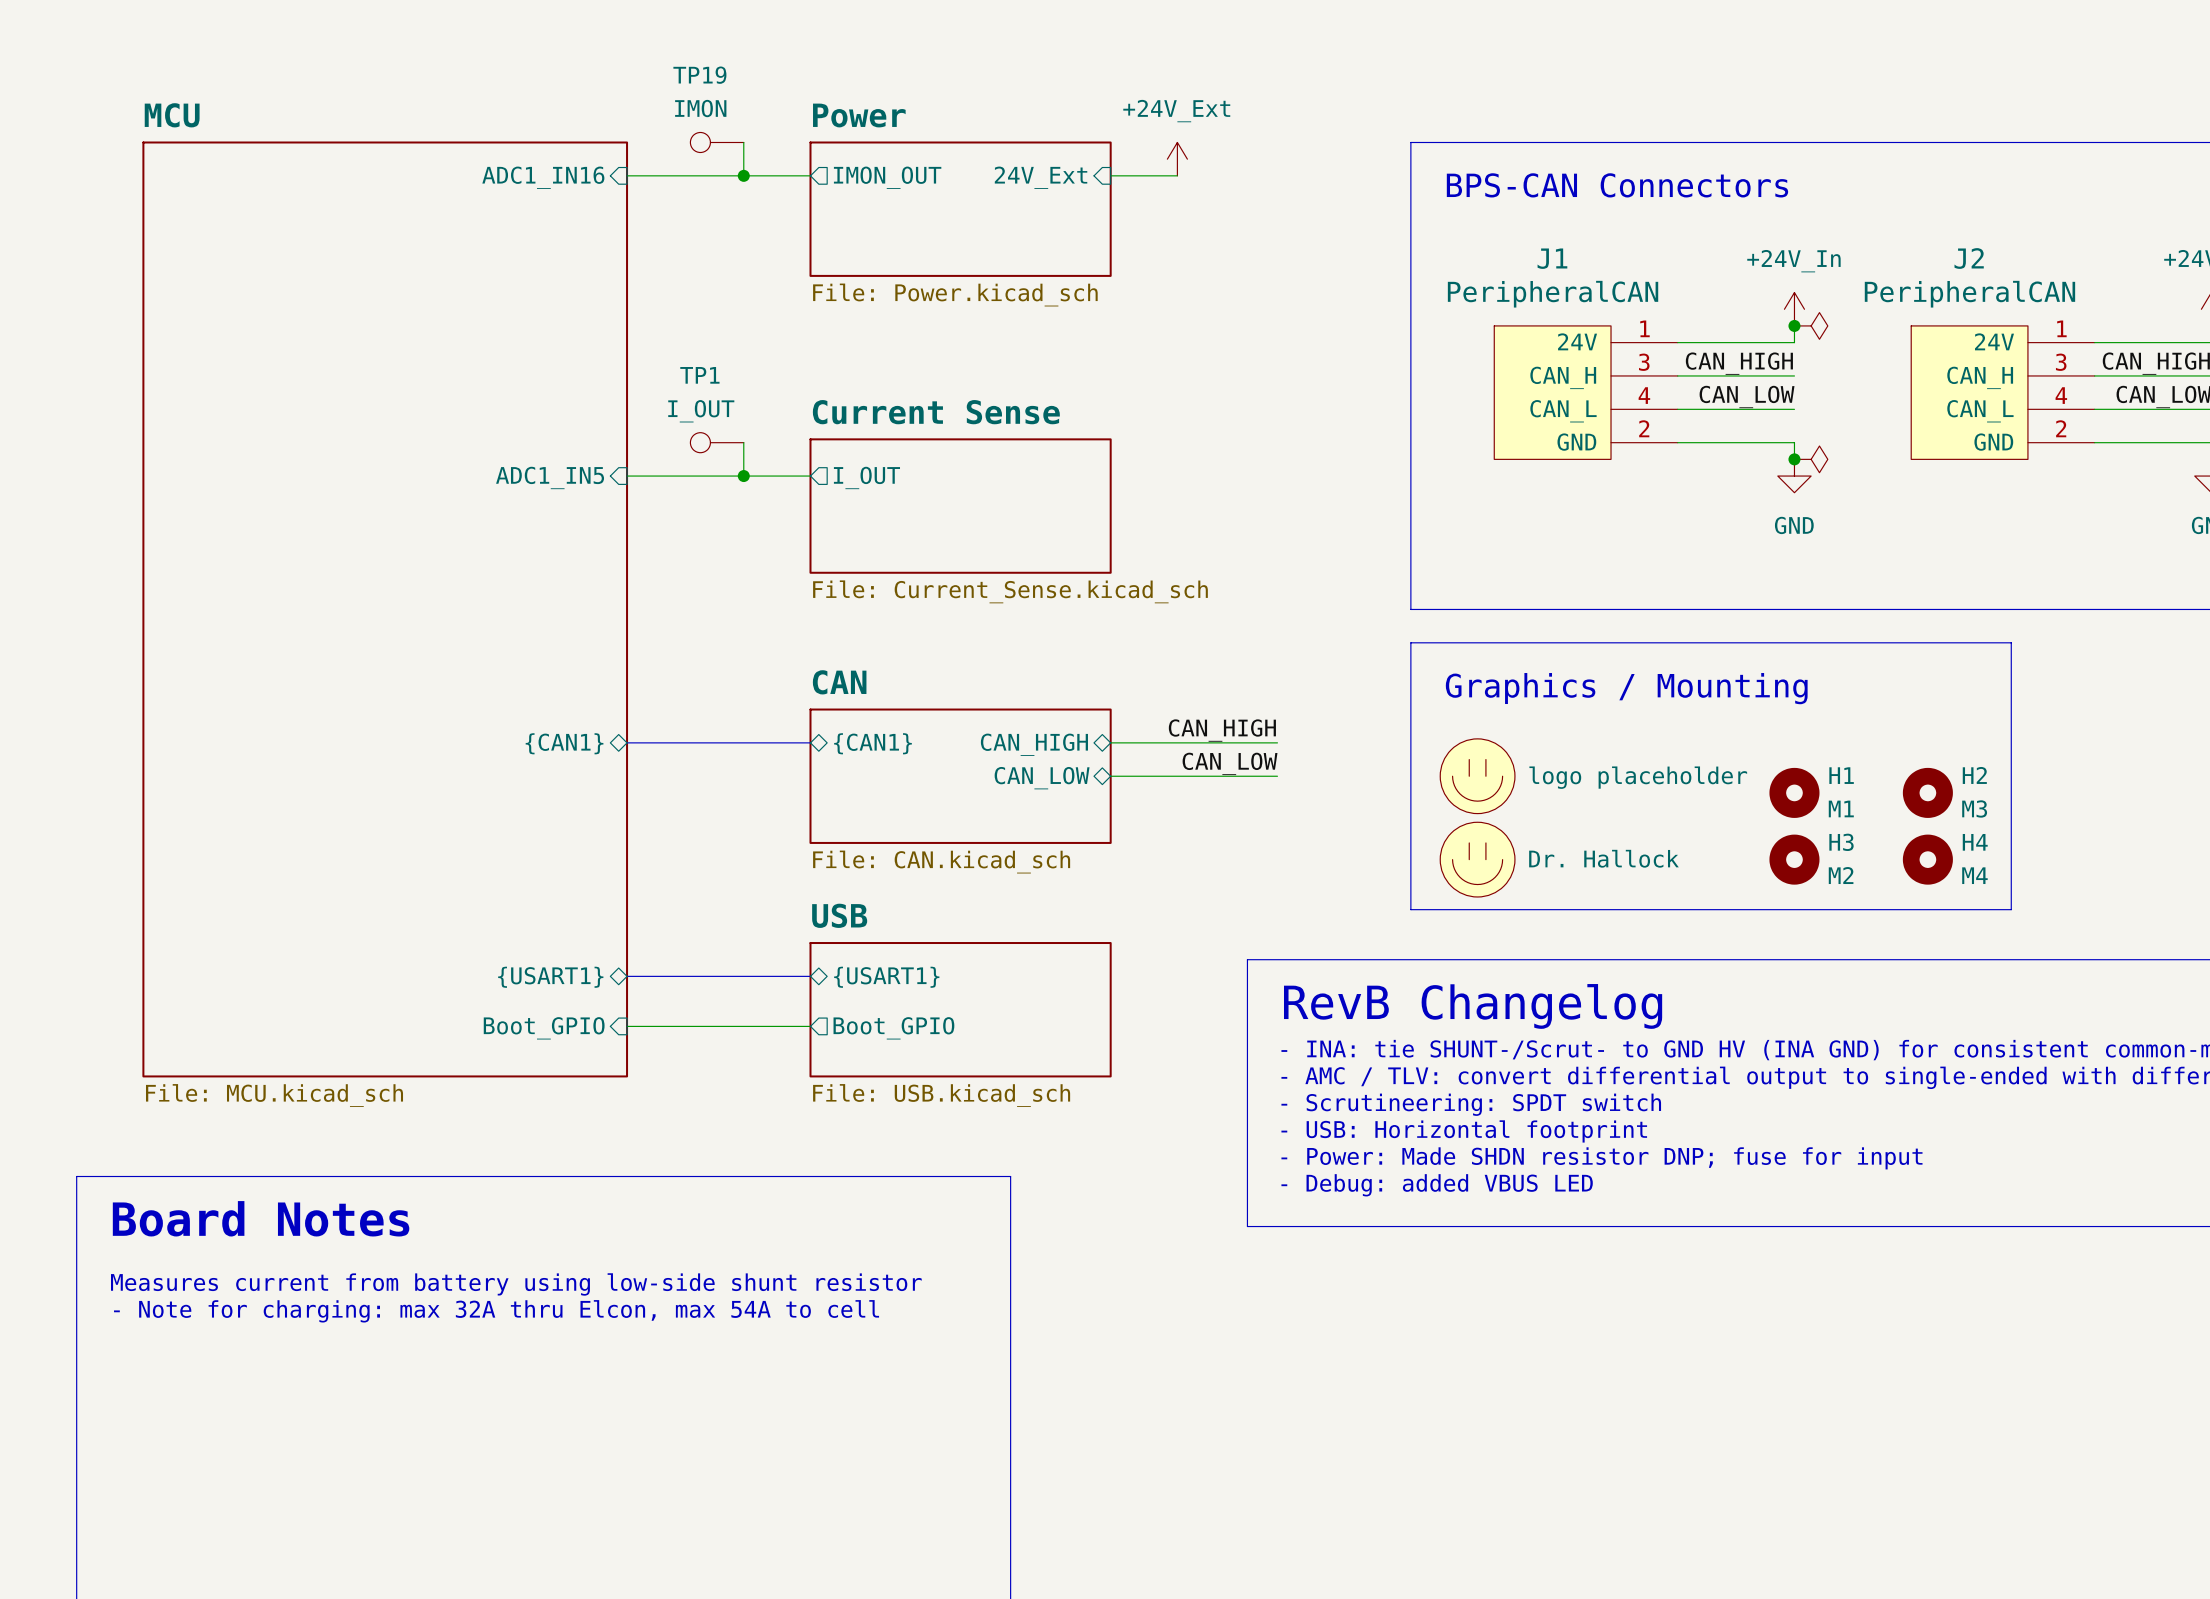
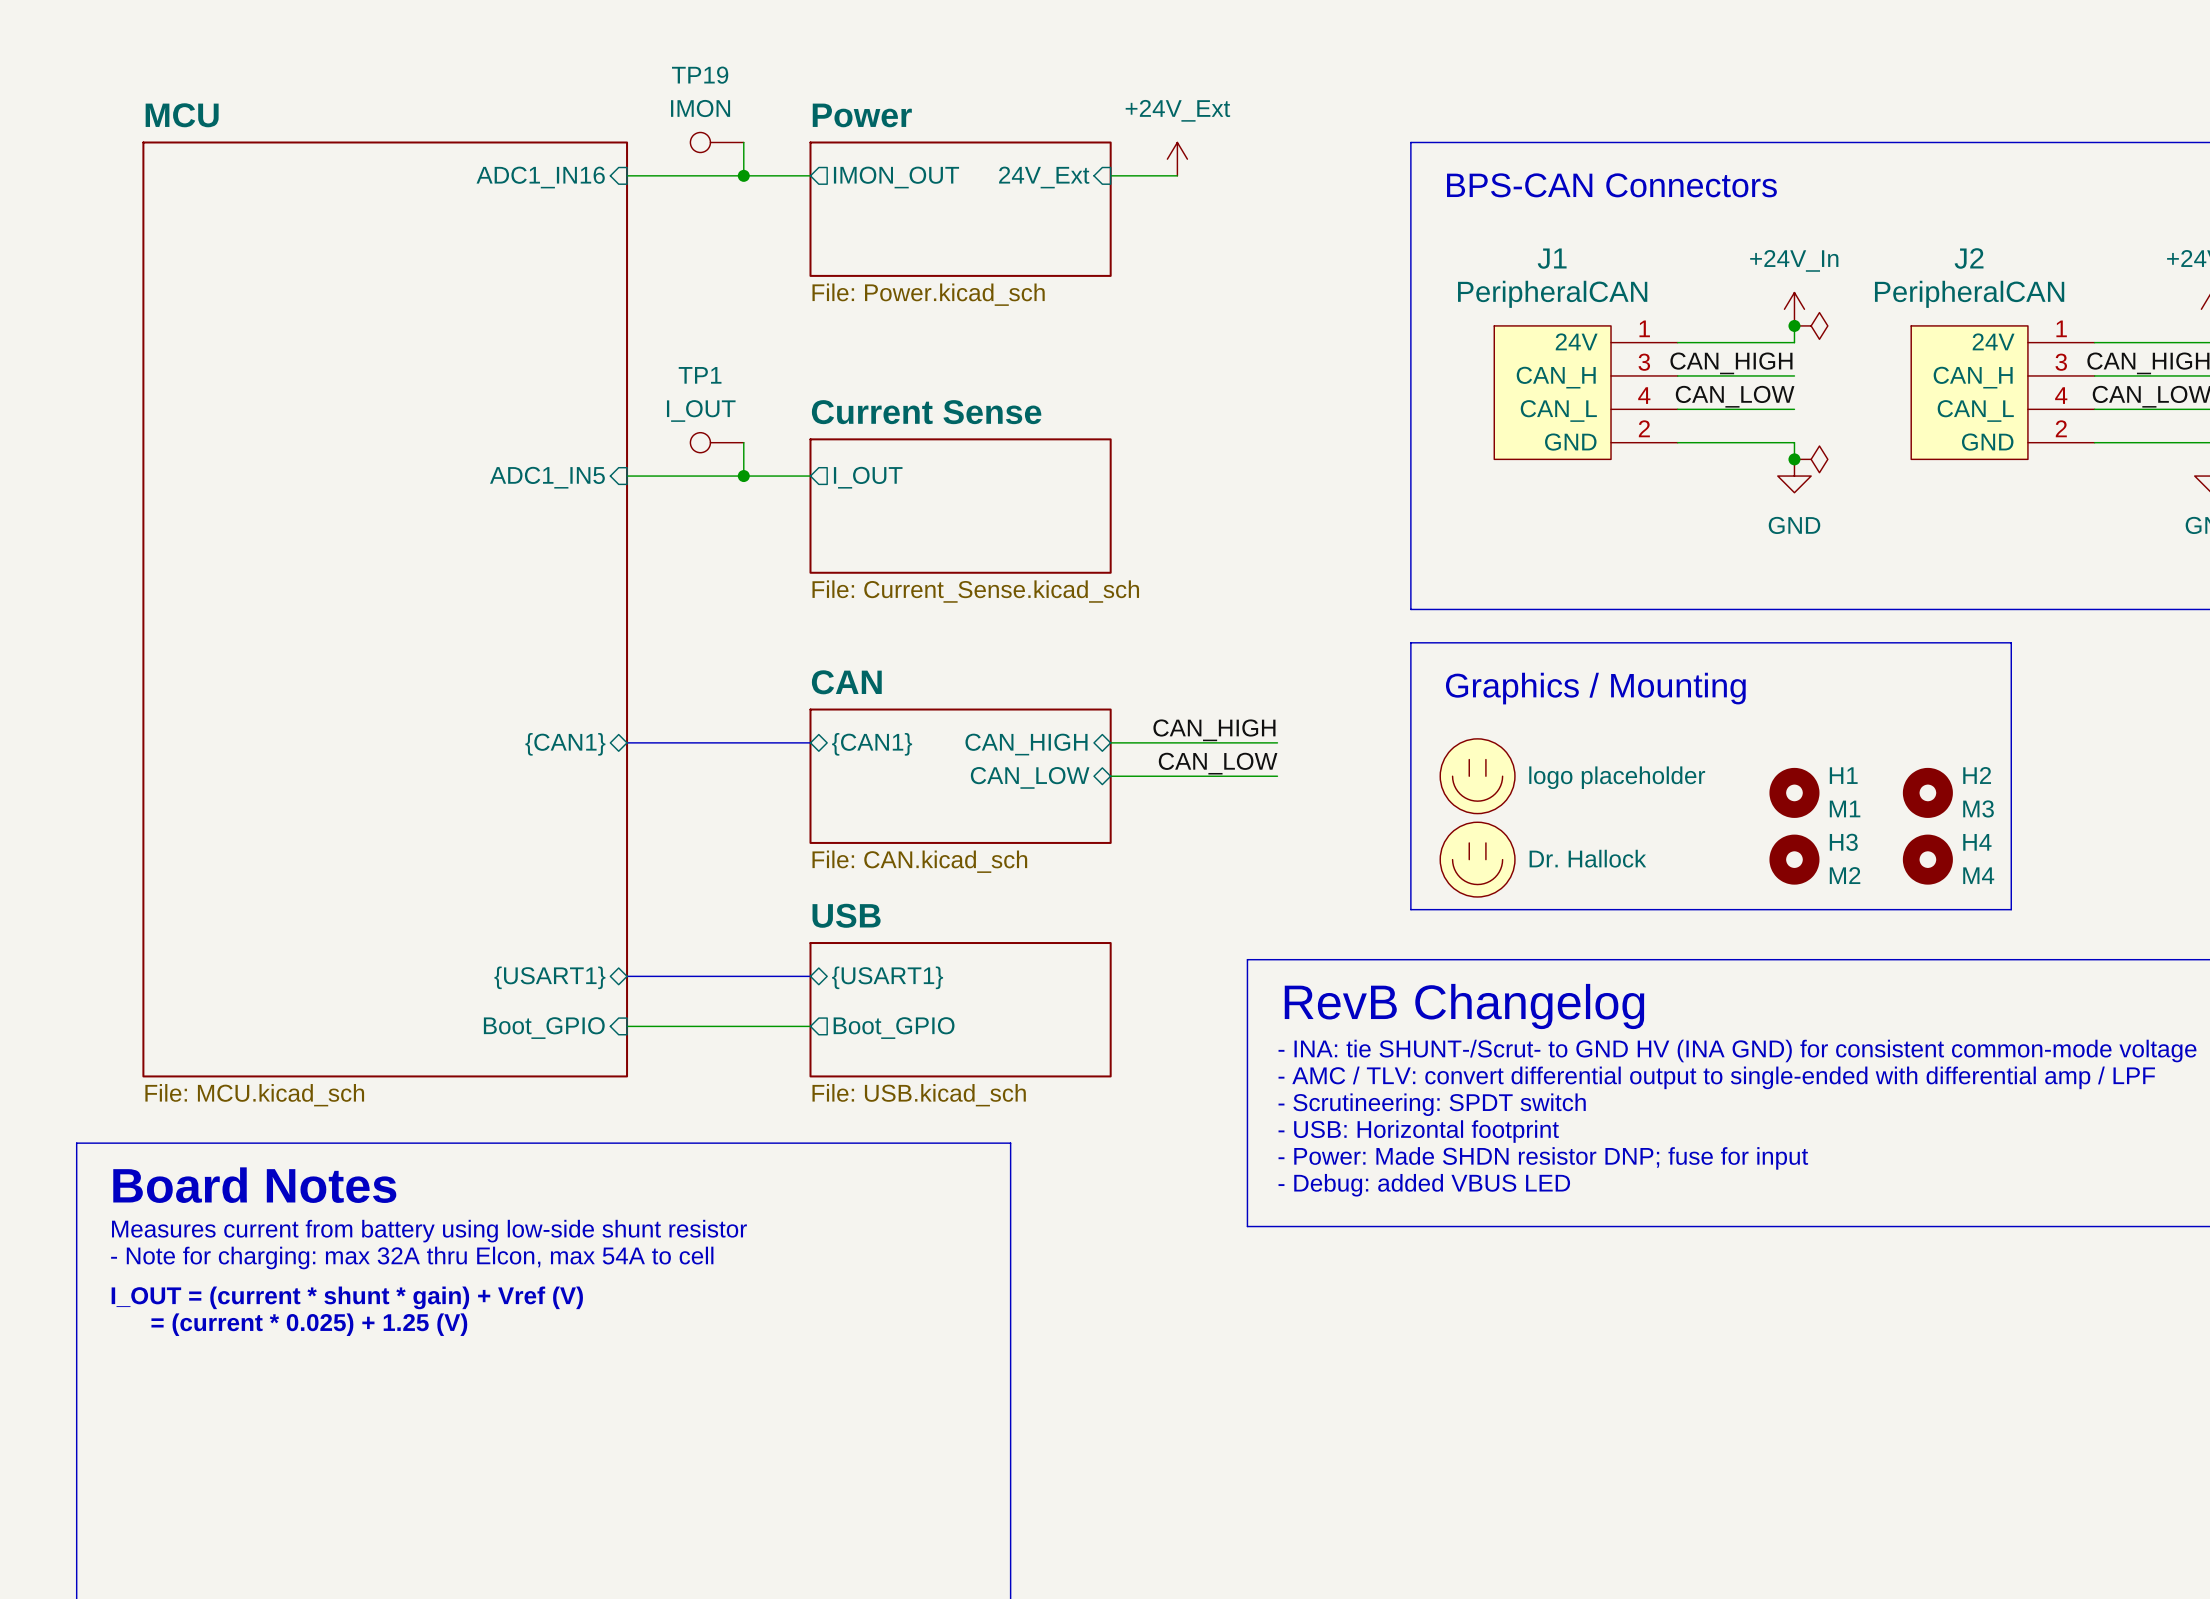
line: (76, 1176) (1010, 1176) -> (76, 1176) (76, 1143) (1010, 1143) (1010, 1176)
text: none -> Board Notes (254, 1185)
text: Board Notes (261, 1218) -> - Note for charging: max 32A thru Elcon, max 54A to cell (412, 1257)
text position: Measures current from battery using low-side shunt resistor (516, 1284) -> Measures current from battery using low-side shunt resistor (429, 1231)
text: none -> I_OUT = (current * shunt * gain) + Vref (V) (347, 1297)
text: - Note for charging: max 32A thru Elcon, max 54A to cell (496, 1311) -> none
text: none -> = (current * 0.025) + 1.25 (V) (309, 1324)

